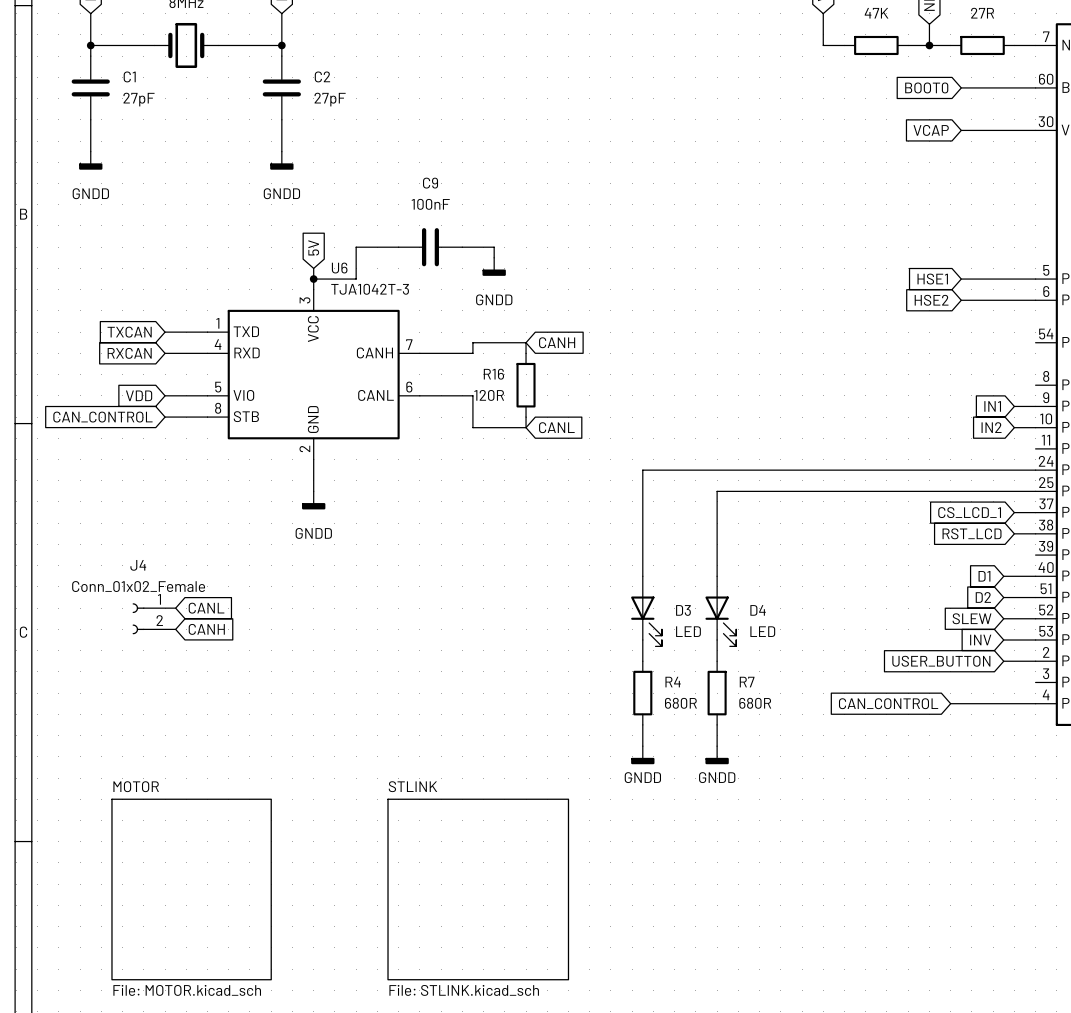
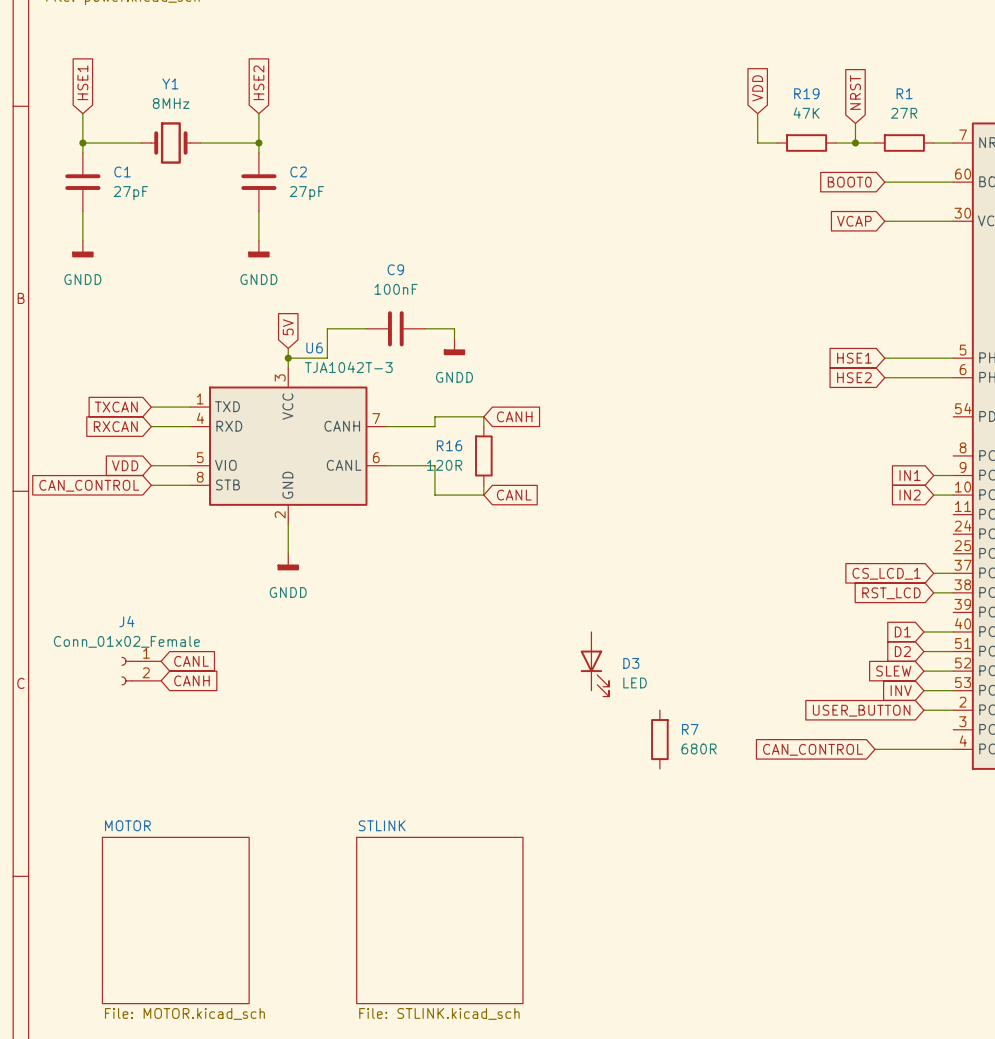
wire: (1035, 470) (642, 470) (642, 576) -> none
wire: (1035, 491) (717, 491) (717, 576) -> none
D4: LED (720, 611) -> none
wire: (642, 640) (642, 661) -> none
wire: (717, 640) (717, 661) -> none
R4: 680R (642, 693) -> none
wire: (642, 724) (642, 746) -> none
wire: (717, 724) (717, 746) -> none
power symbol: GNDD (642, 755) -> none
power symbol: GNDD (717, 755) -> none

